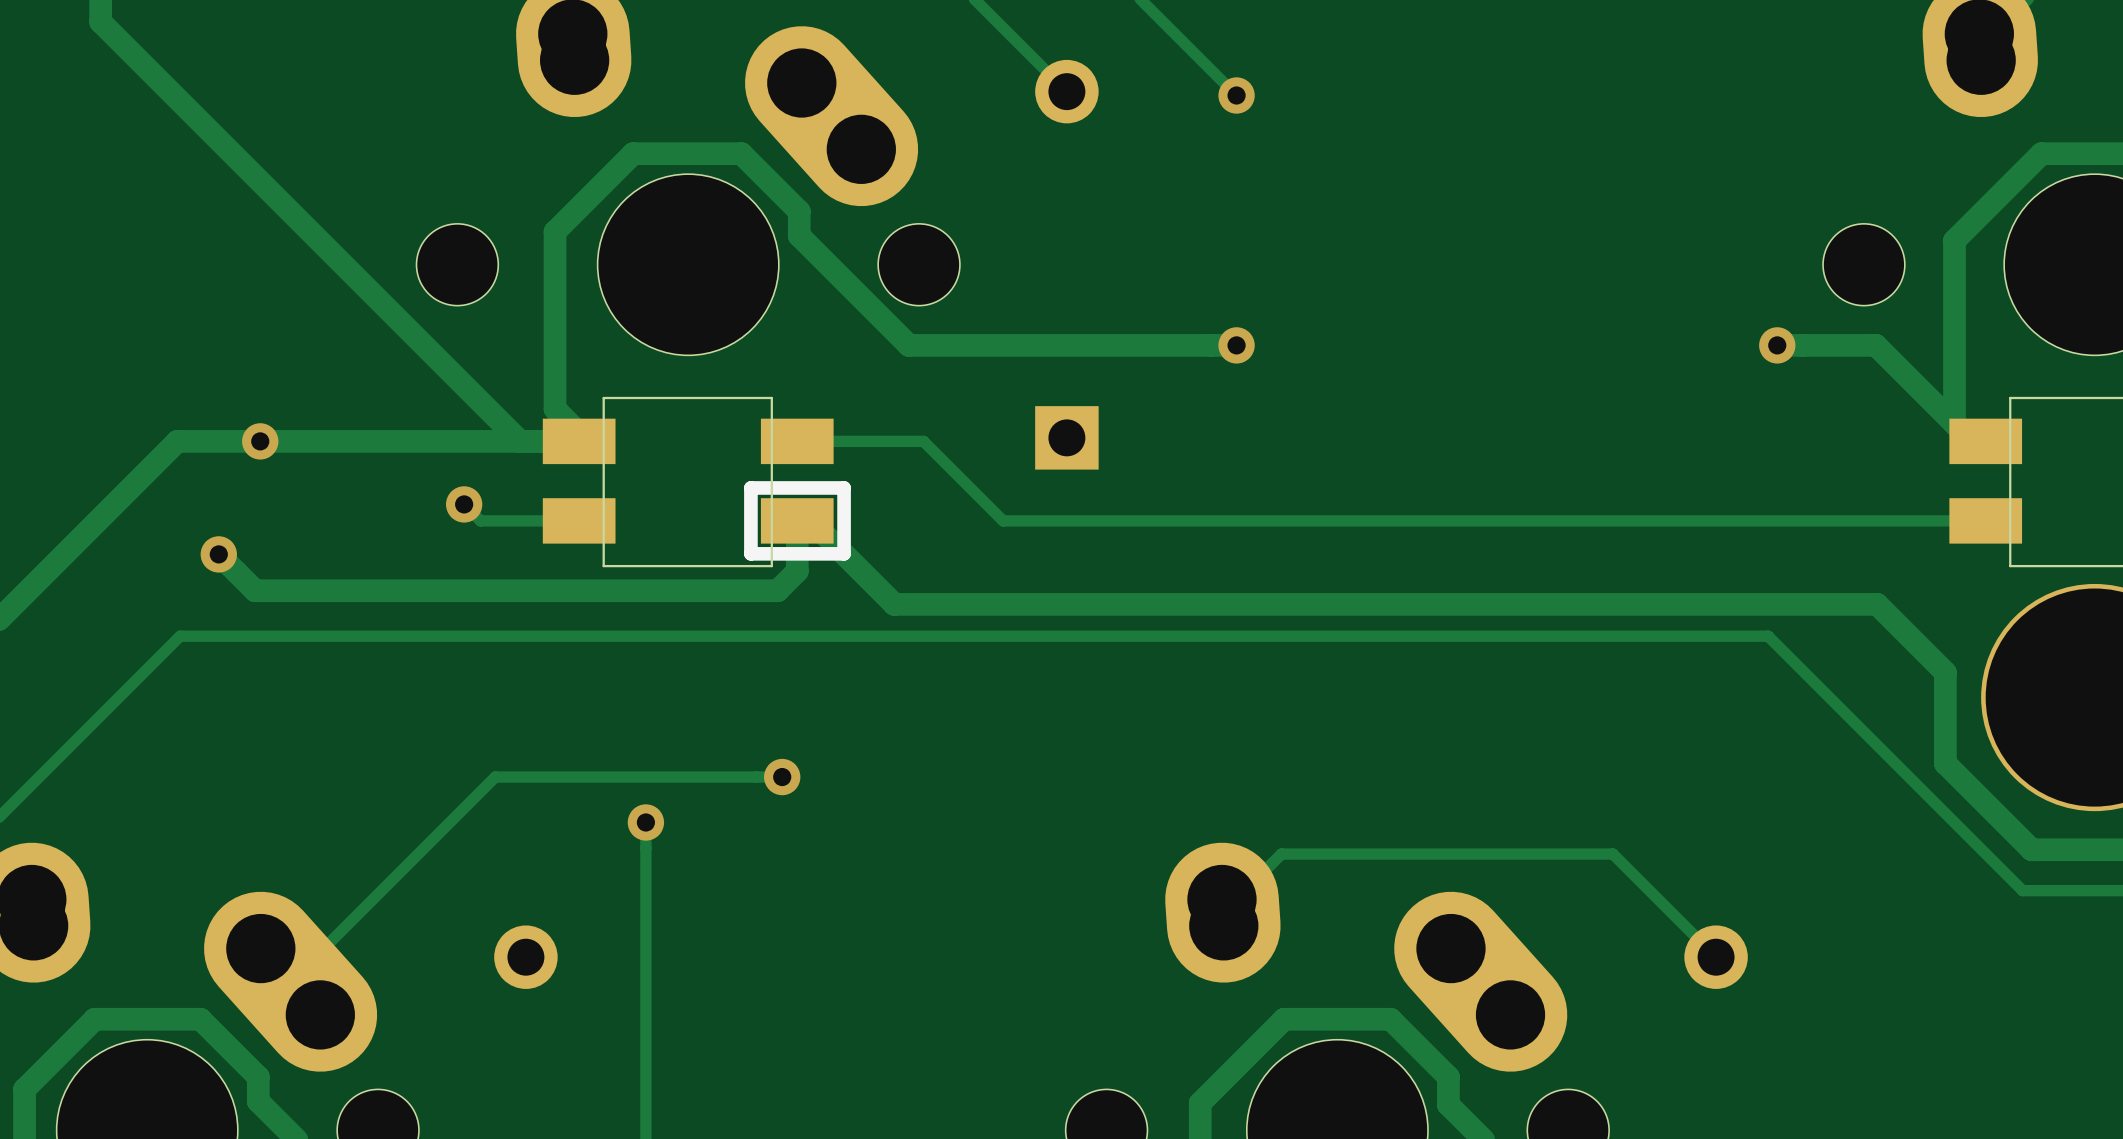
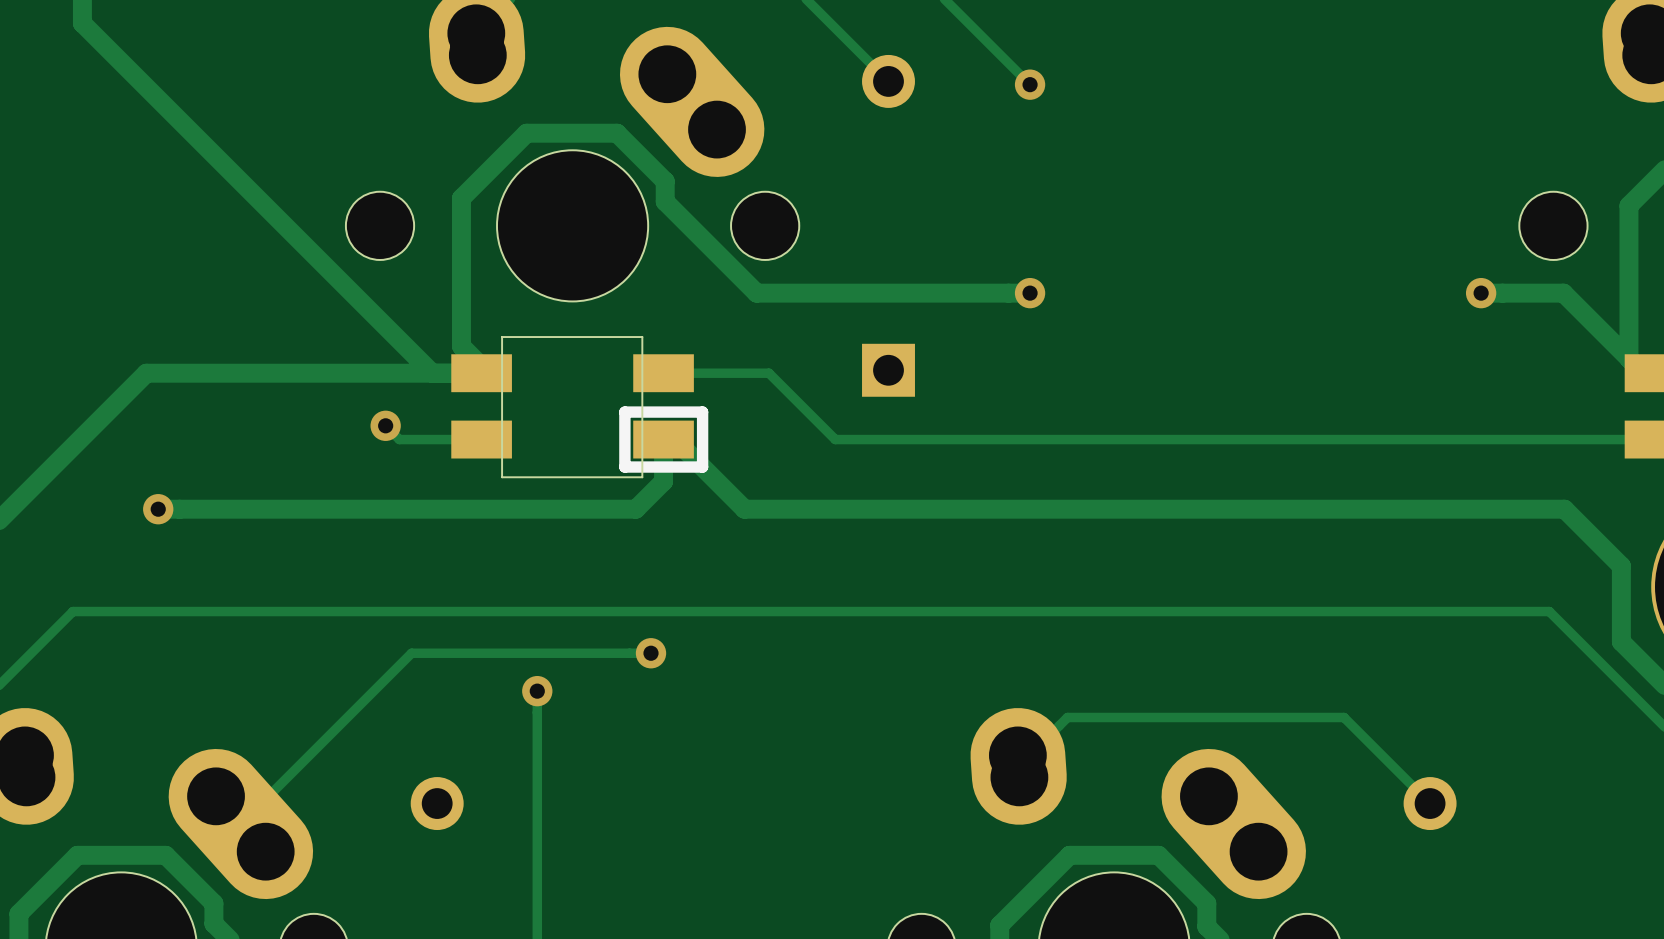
via: (260, 441) -> none
track: (218, 554) (255, 590) (777, 590) -> (158, 509) (635, 509) (647, 497)
via position: (218, 554) -> (158, 509)
track: (1859, 727) (1768, 636) (180, 636) (89, 727) -> (1549, 611) (72, 611)

